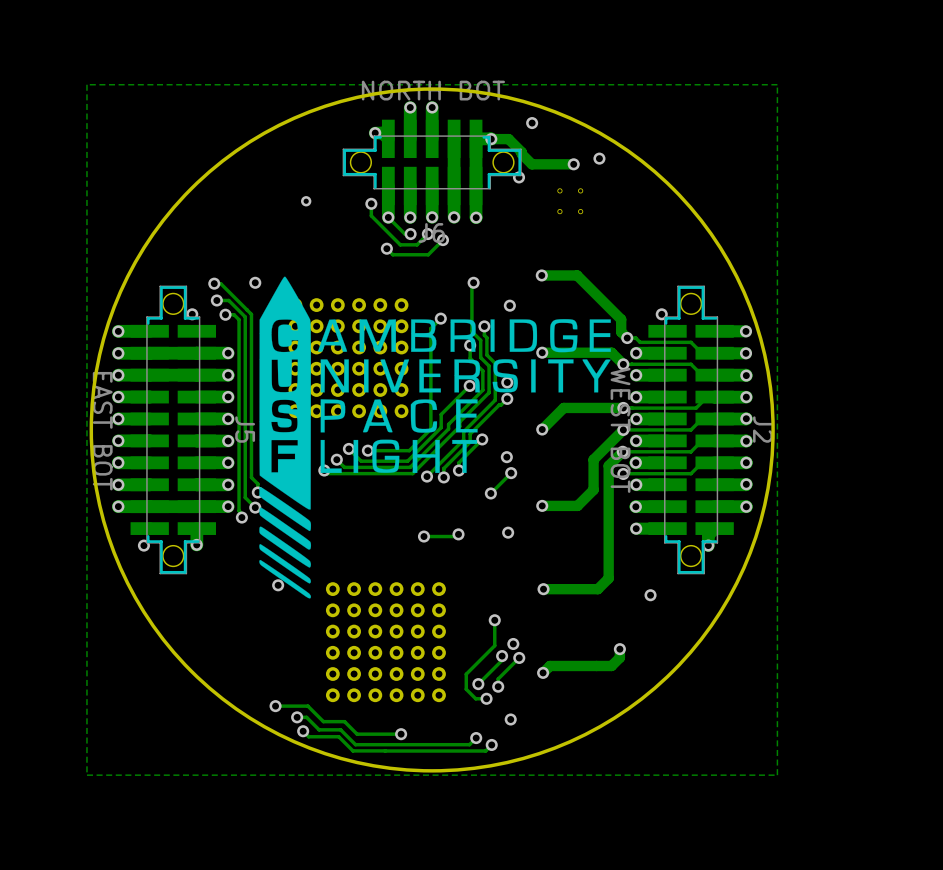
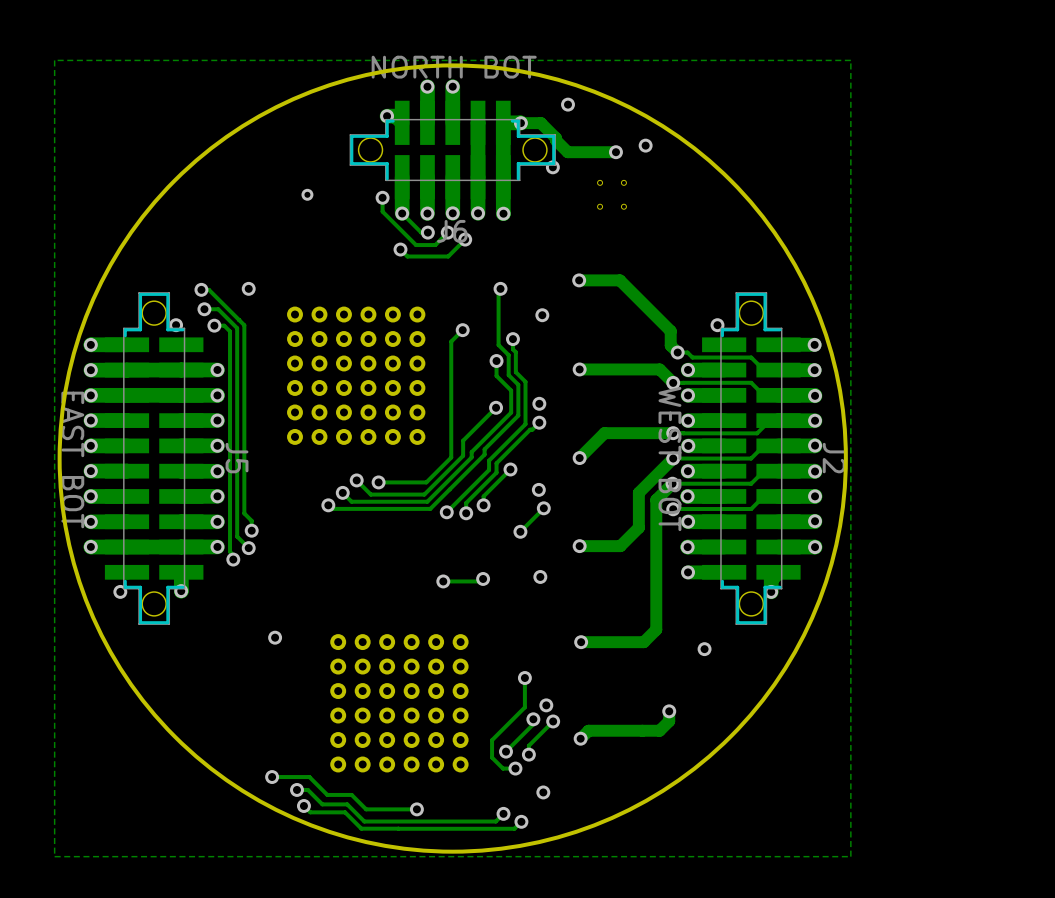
drawing: [259, 276, 611, 599] -> none

